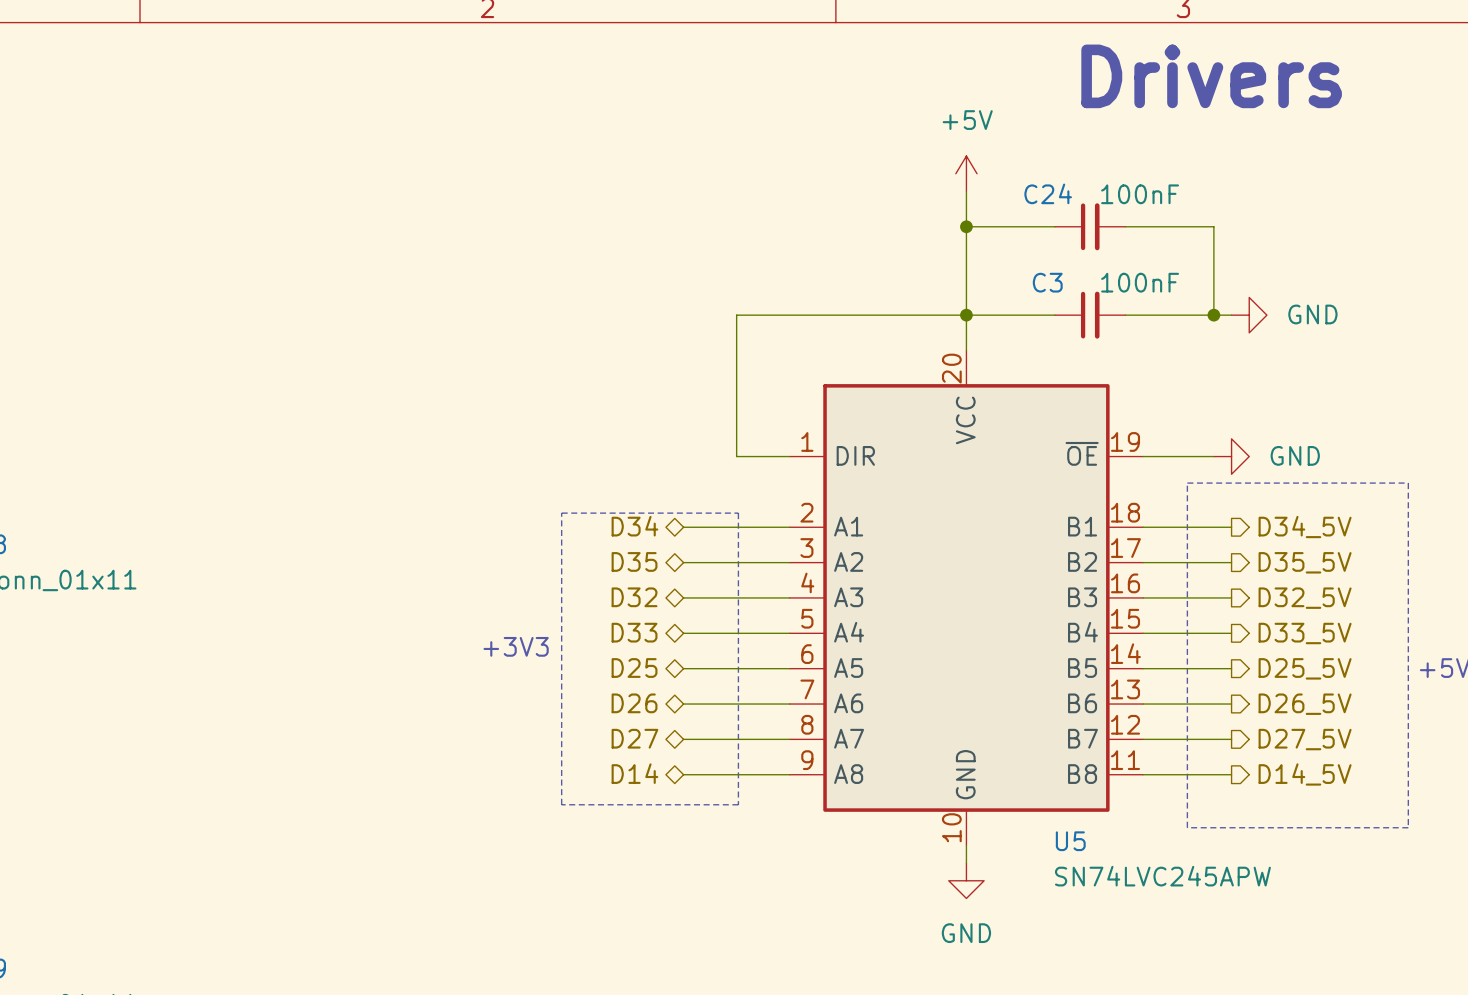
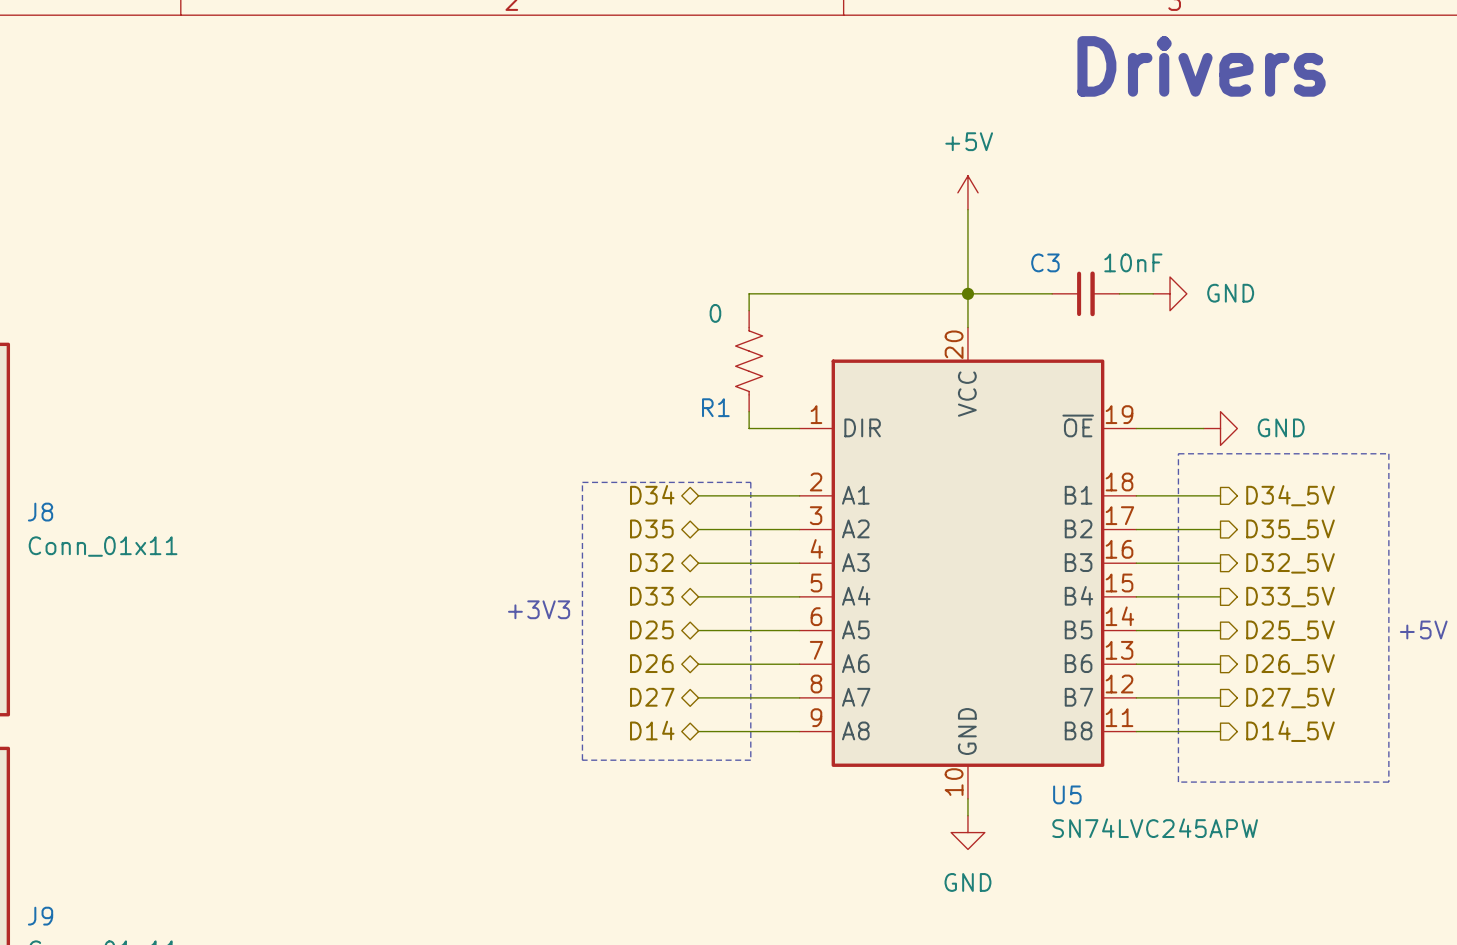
power symbol position: +5V (966, 173) -> +5V (967, 192)
wire: (966, 191) (966, 226) (1054, 226) -> none
junction: (966, 226) -> none
C24: 100nF (1090, 226) -> none
wire: (1125, 226) (1213, 226) (1213, 315) -> none
C3 value: 100nF (1140, 282) -> 10nF (1133, 262)
wire: (1160, 315) (1231, 315) -> none
junction: (1213, 315) -> none
power symbol position: GND (1249, 315) -> GND (1170, 293)
wire: (736, 332) (736, 438) -> none
R1: none -> 0 (749, 361)

